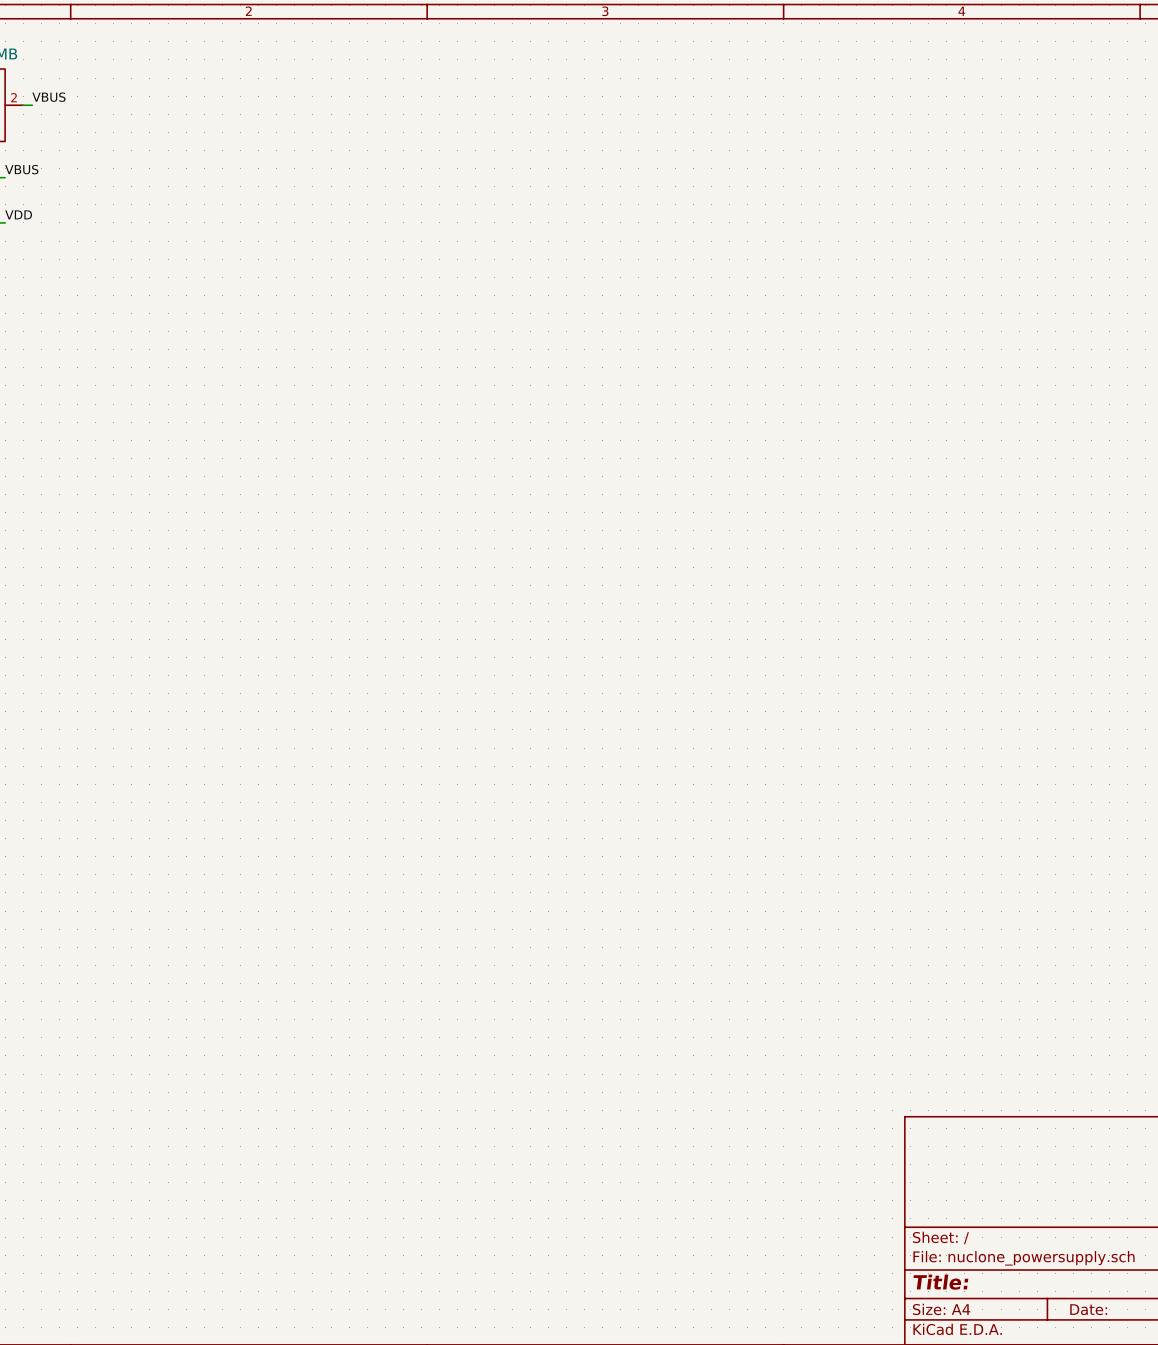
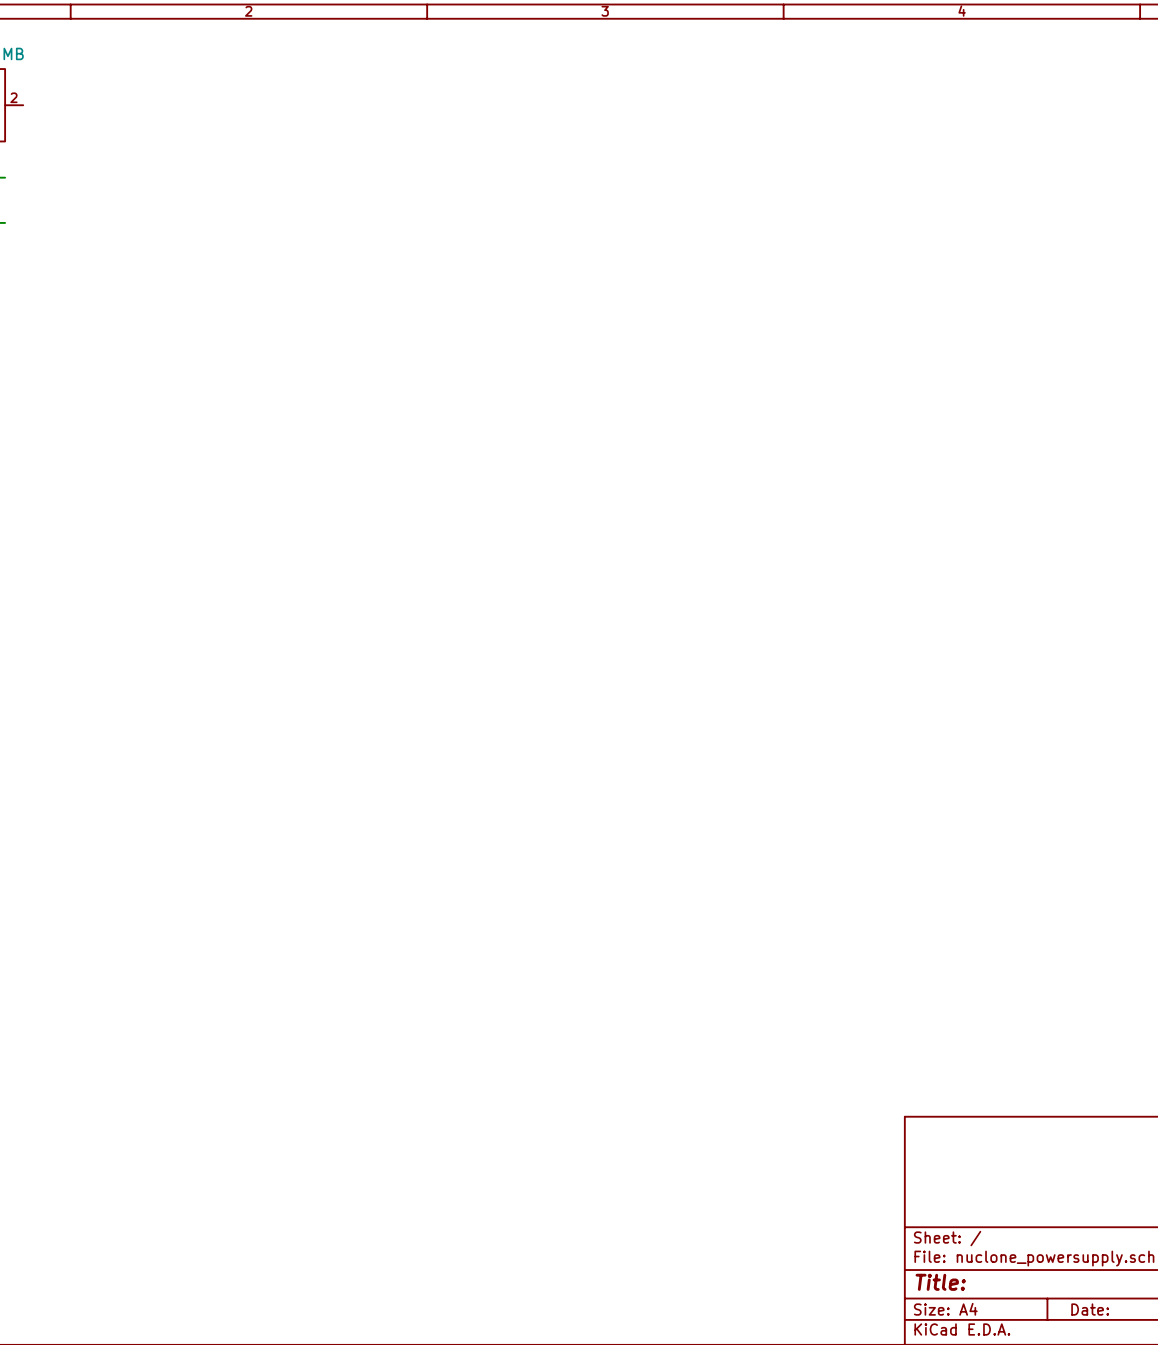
label: VBUS (48, 97) -> none
wire: (23, 105) (32, 105) -> none
label: VBUS (21, 169) -> none
label: VDD (18, 214) -> none

